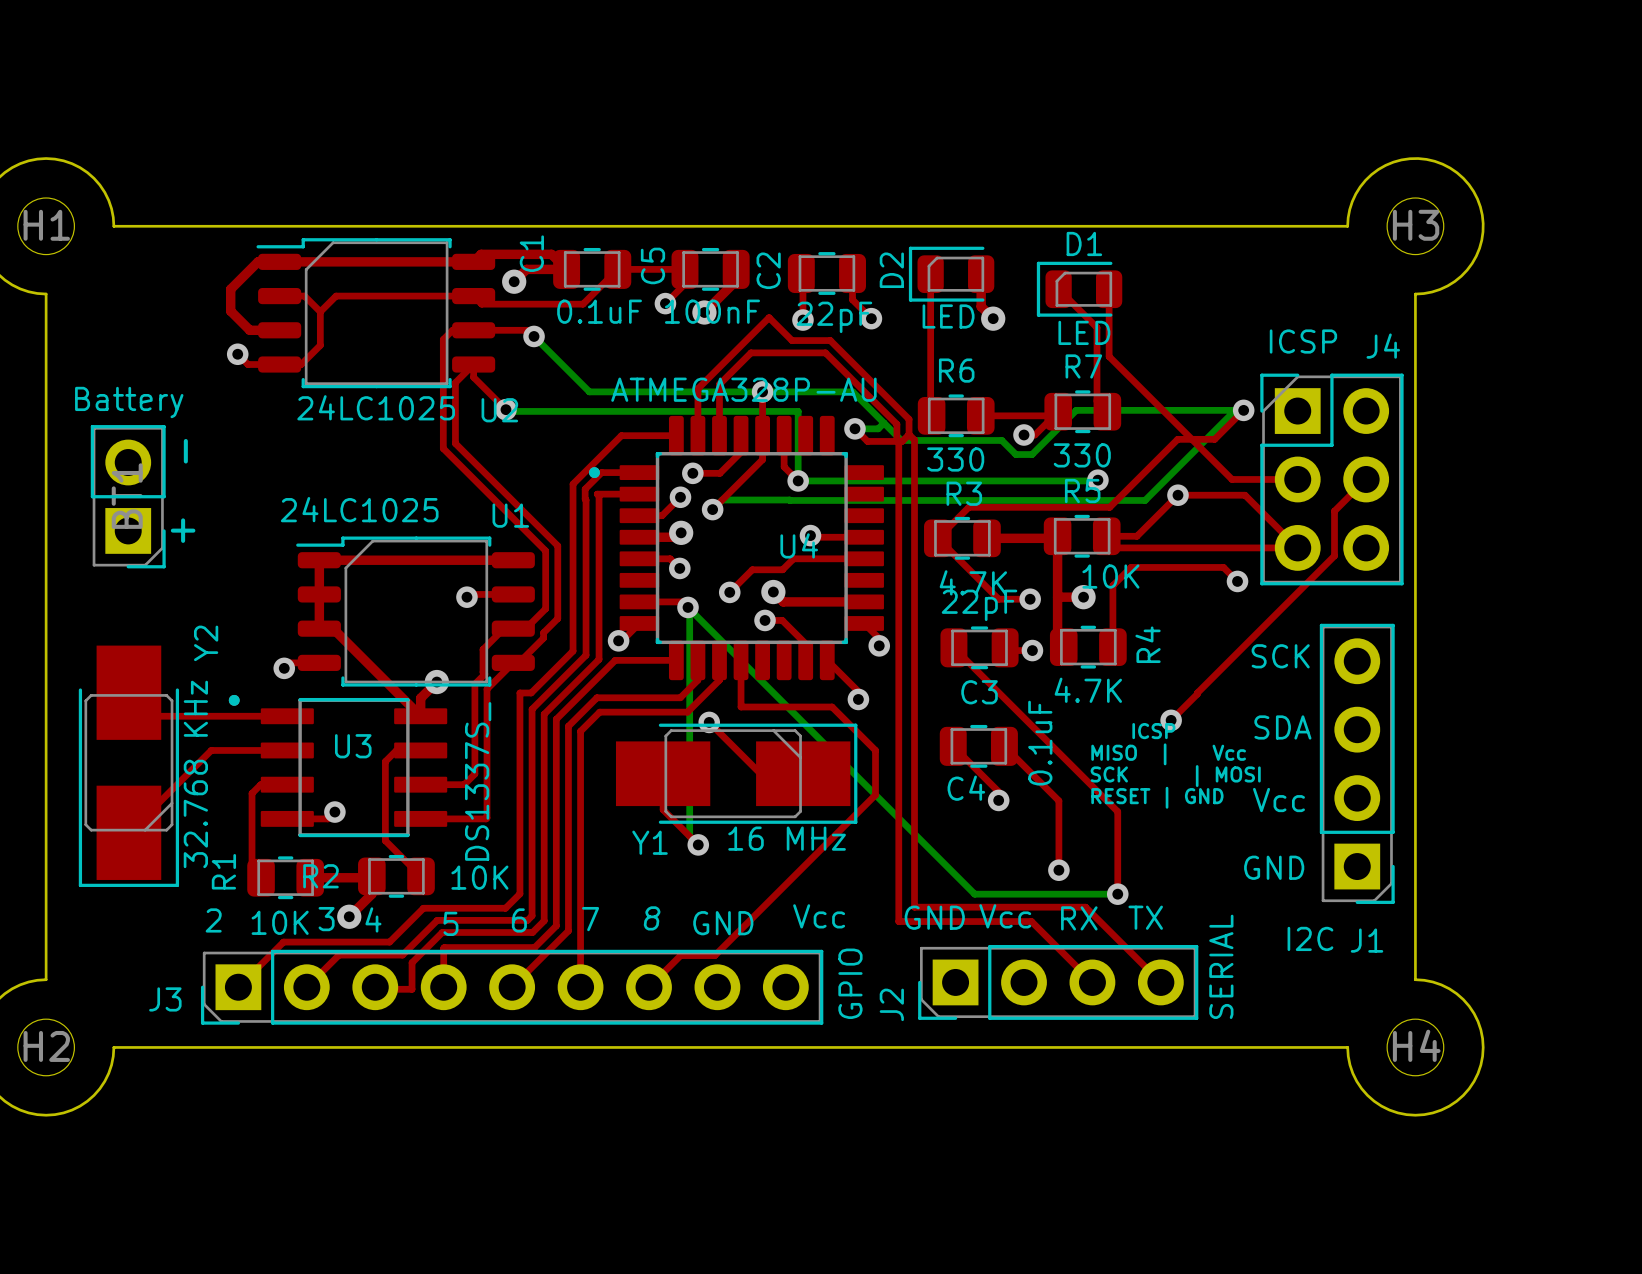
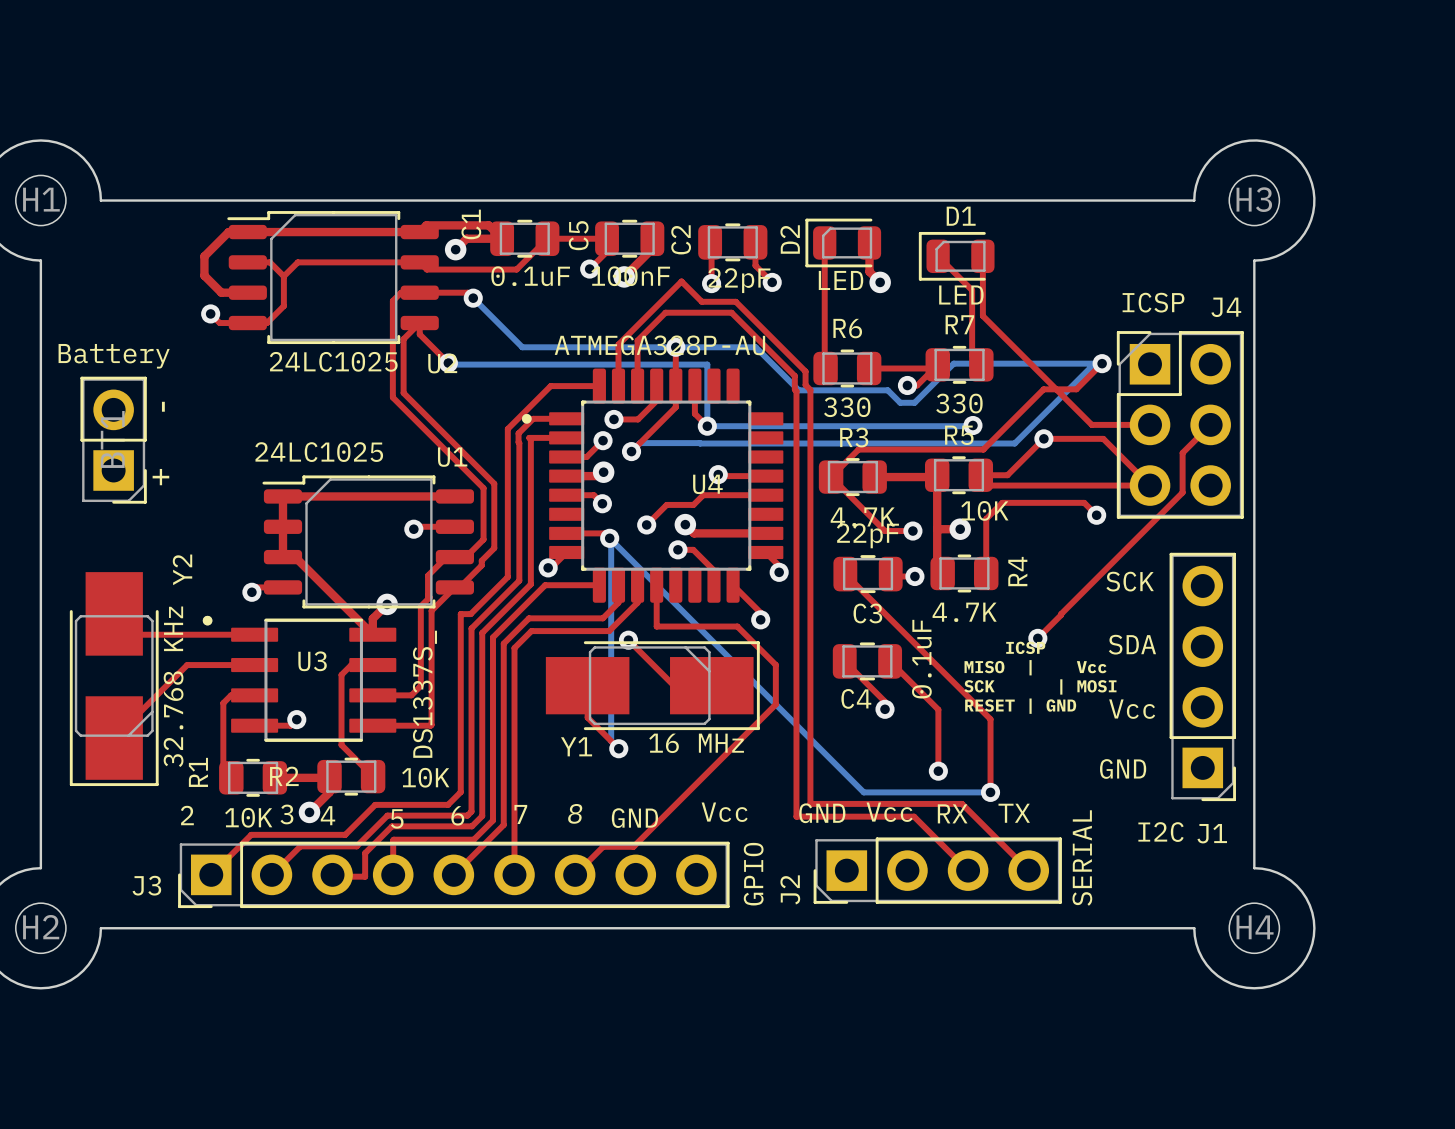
bottom track: (884, 423) (878, 428) (854, 428) -> none
top track: (854, 428) (867, 441) (902, 441) (909, 434) -> none
via: (854, 428) -> none

